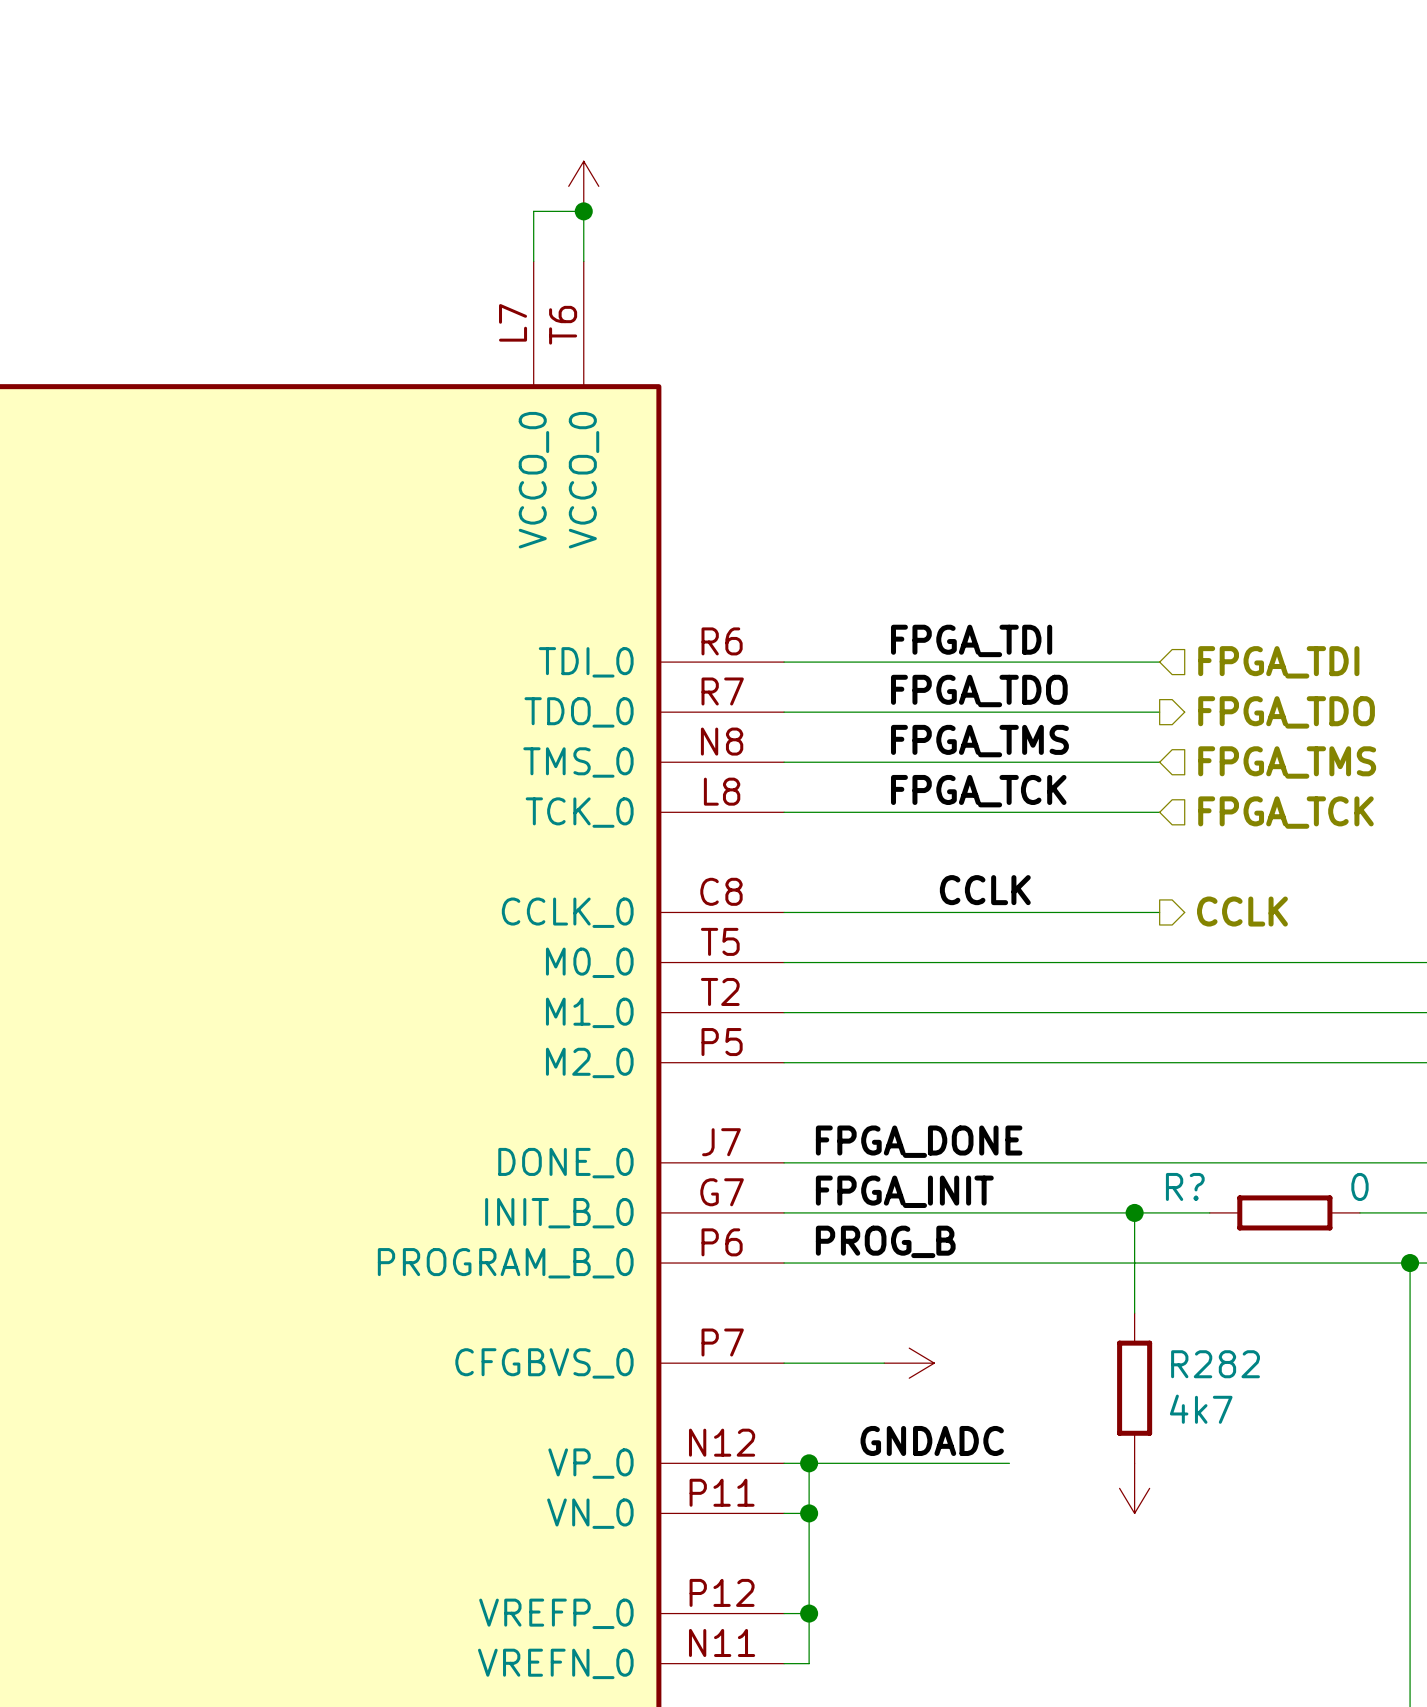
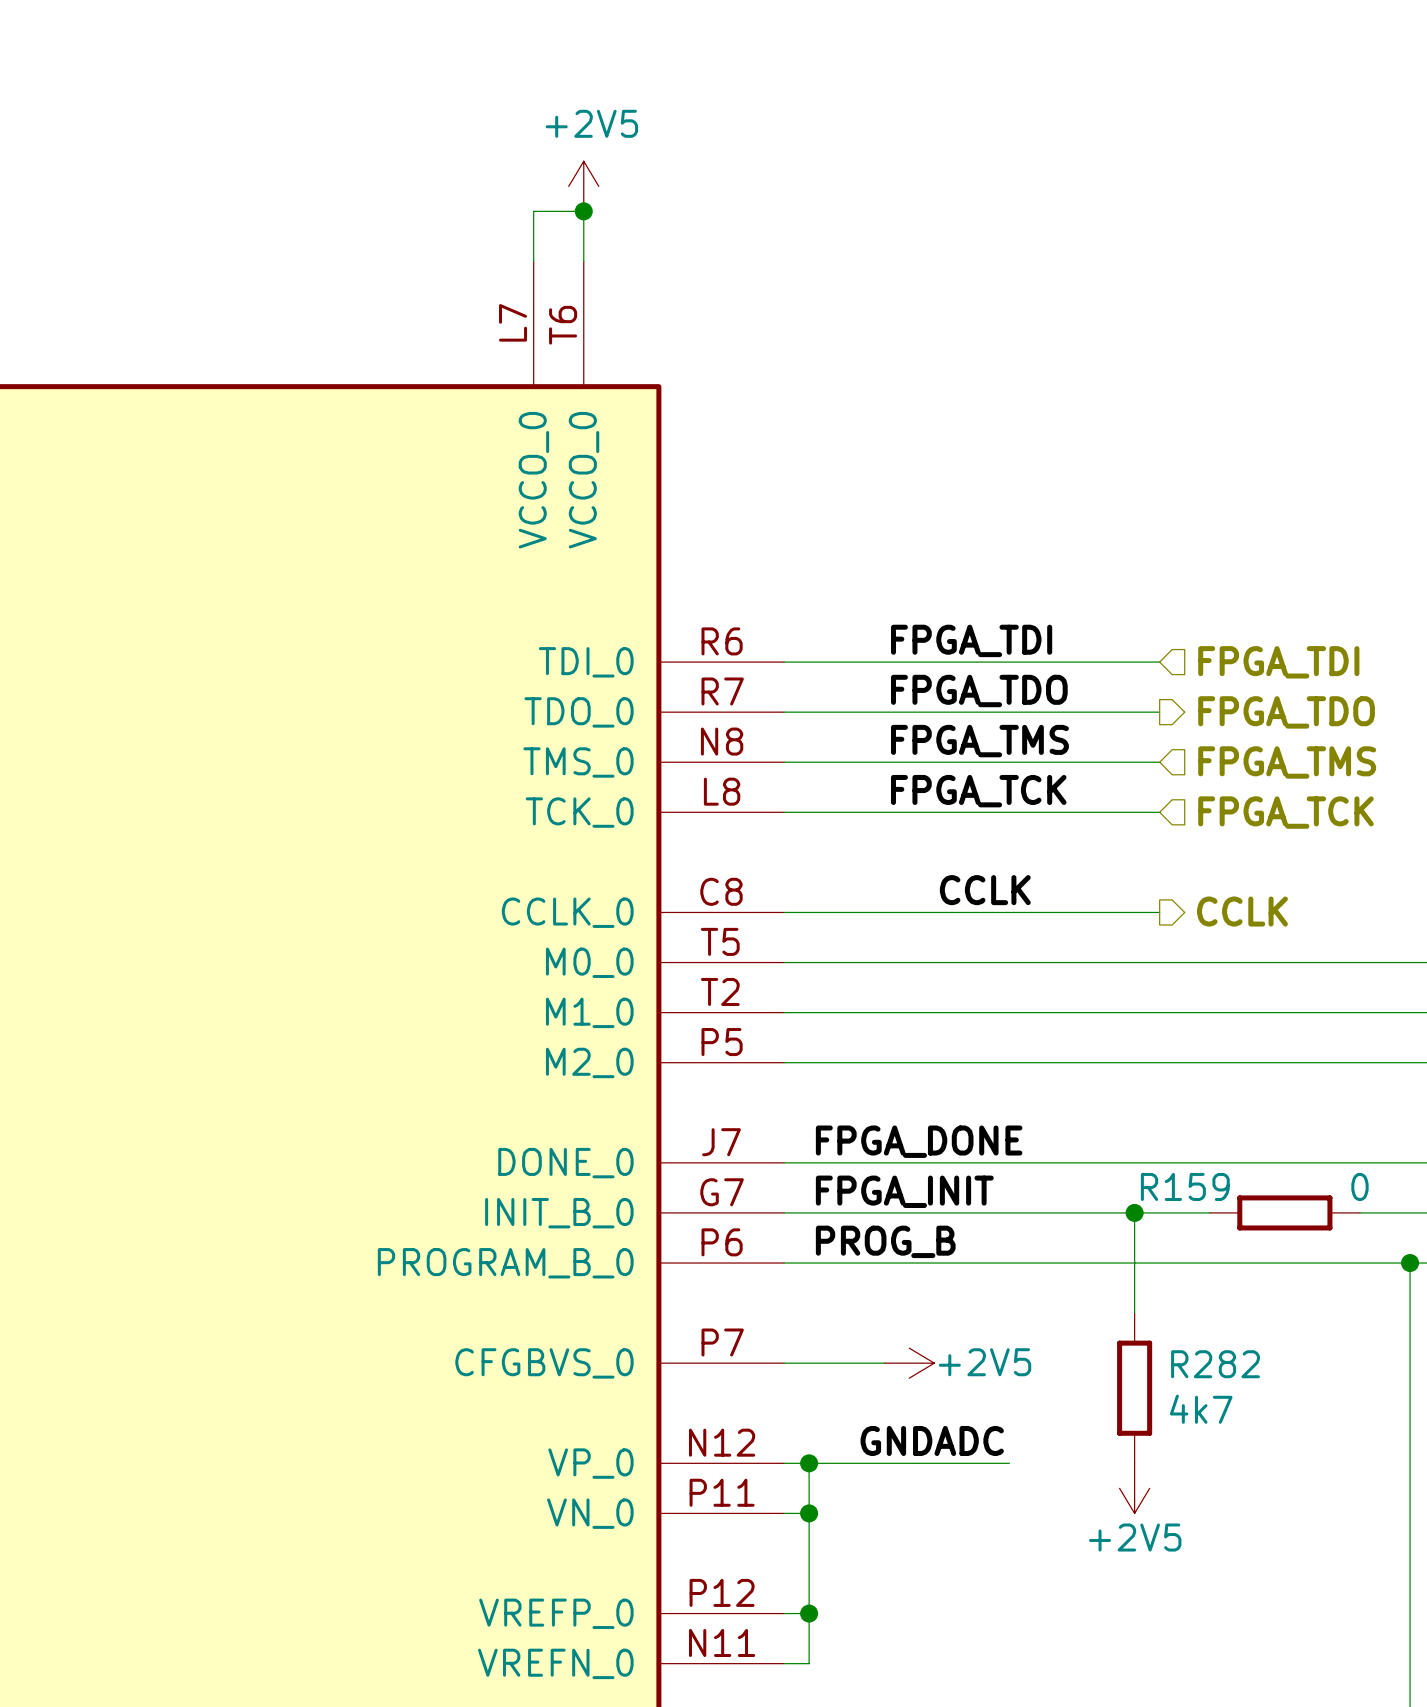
power symbol text: none -> +2V5 (591, 123)
R? name: R? (1185, 1186) -> R159 (1185, 1186)
power symbol text: none -> +2V5 (984, 1362)
power symbol text: none -> +2V5 (1135, 1537)

